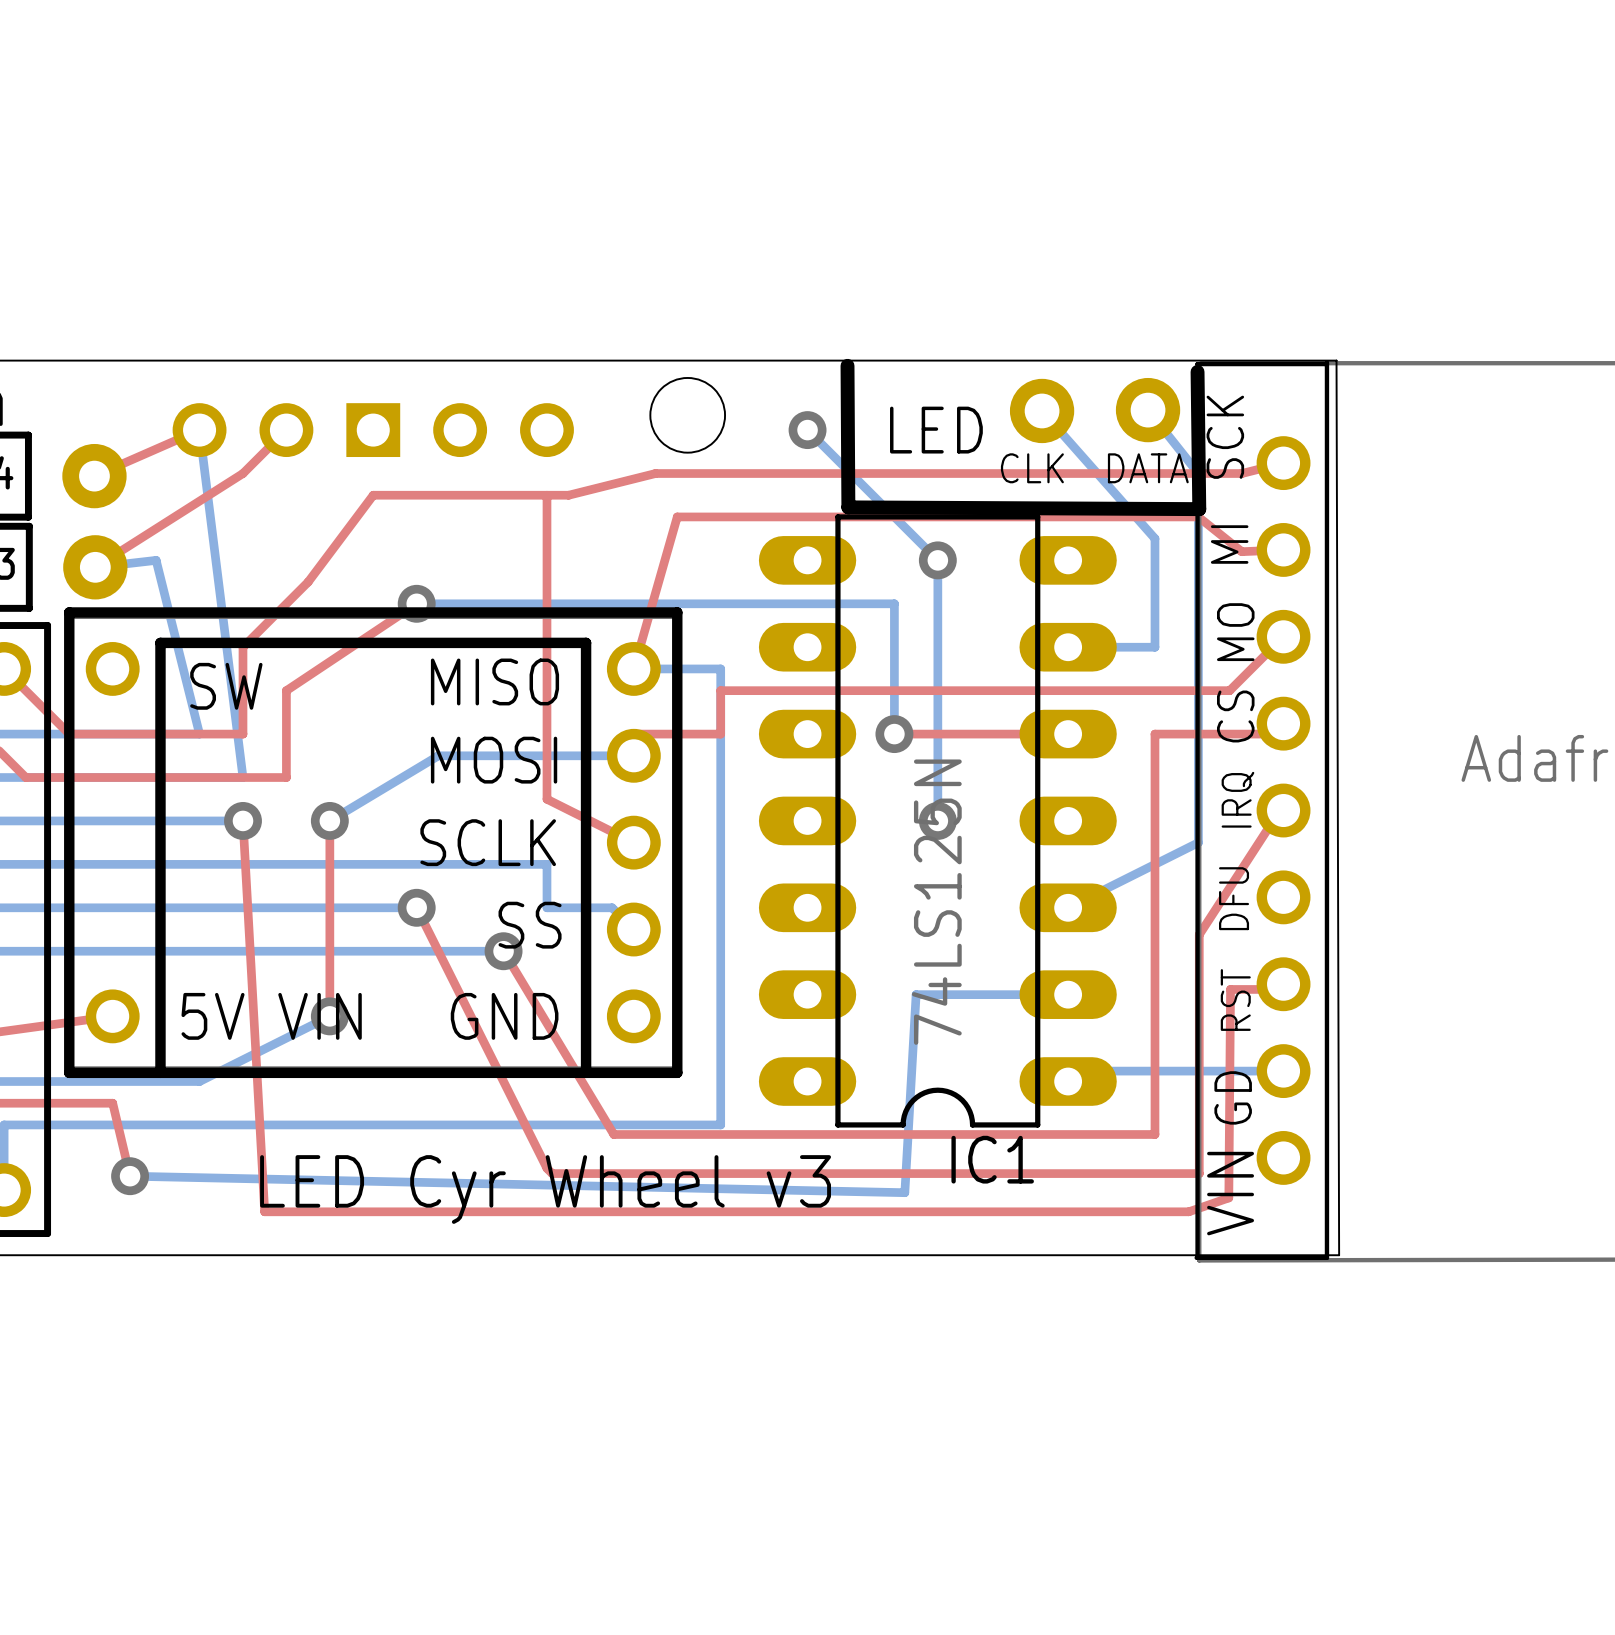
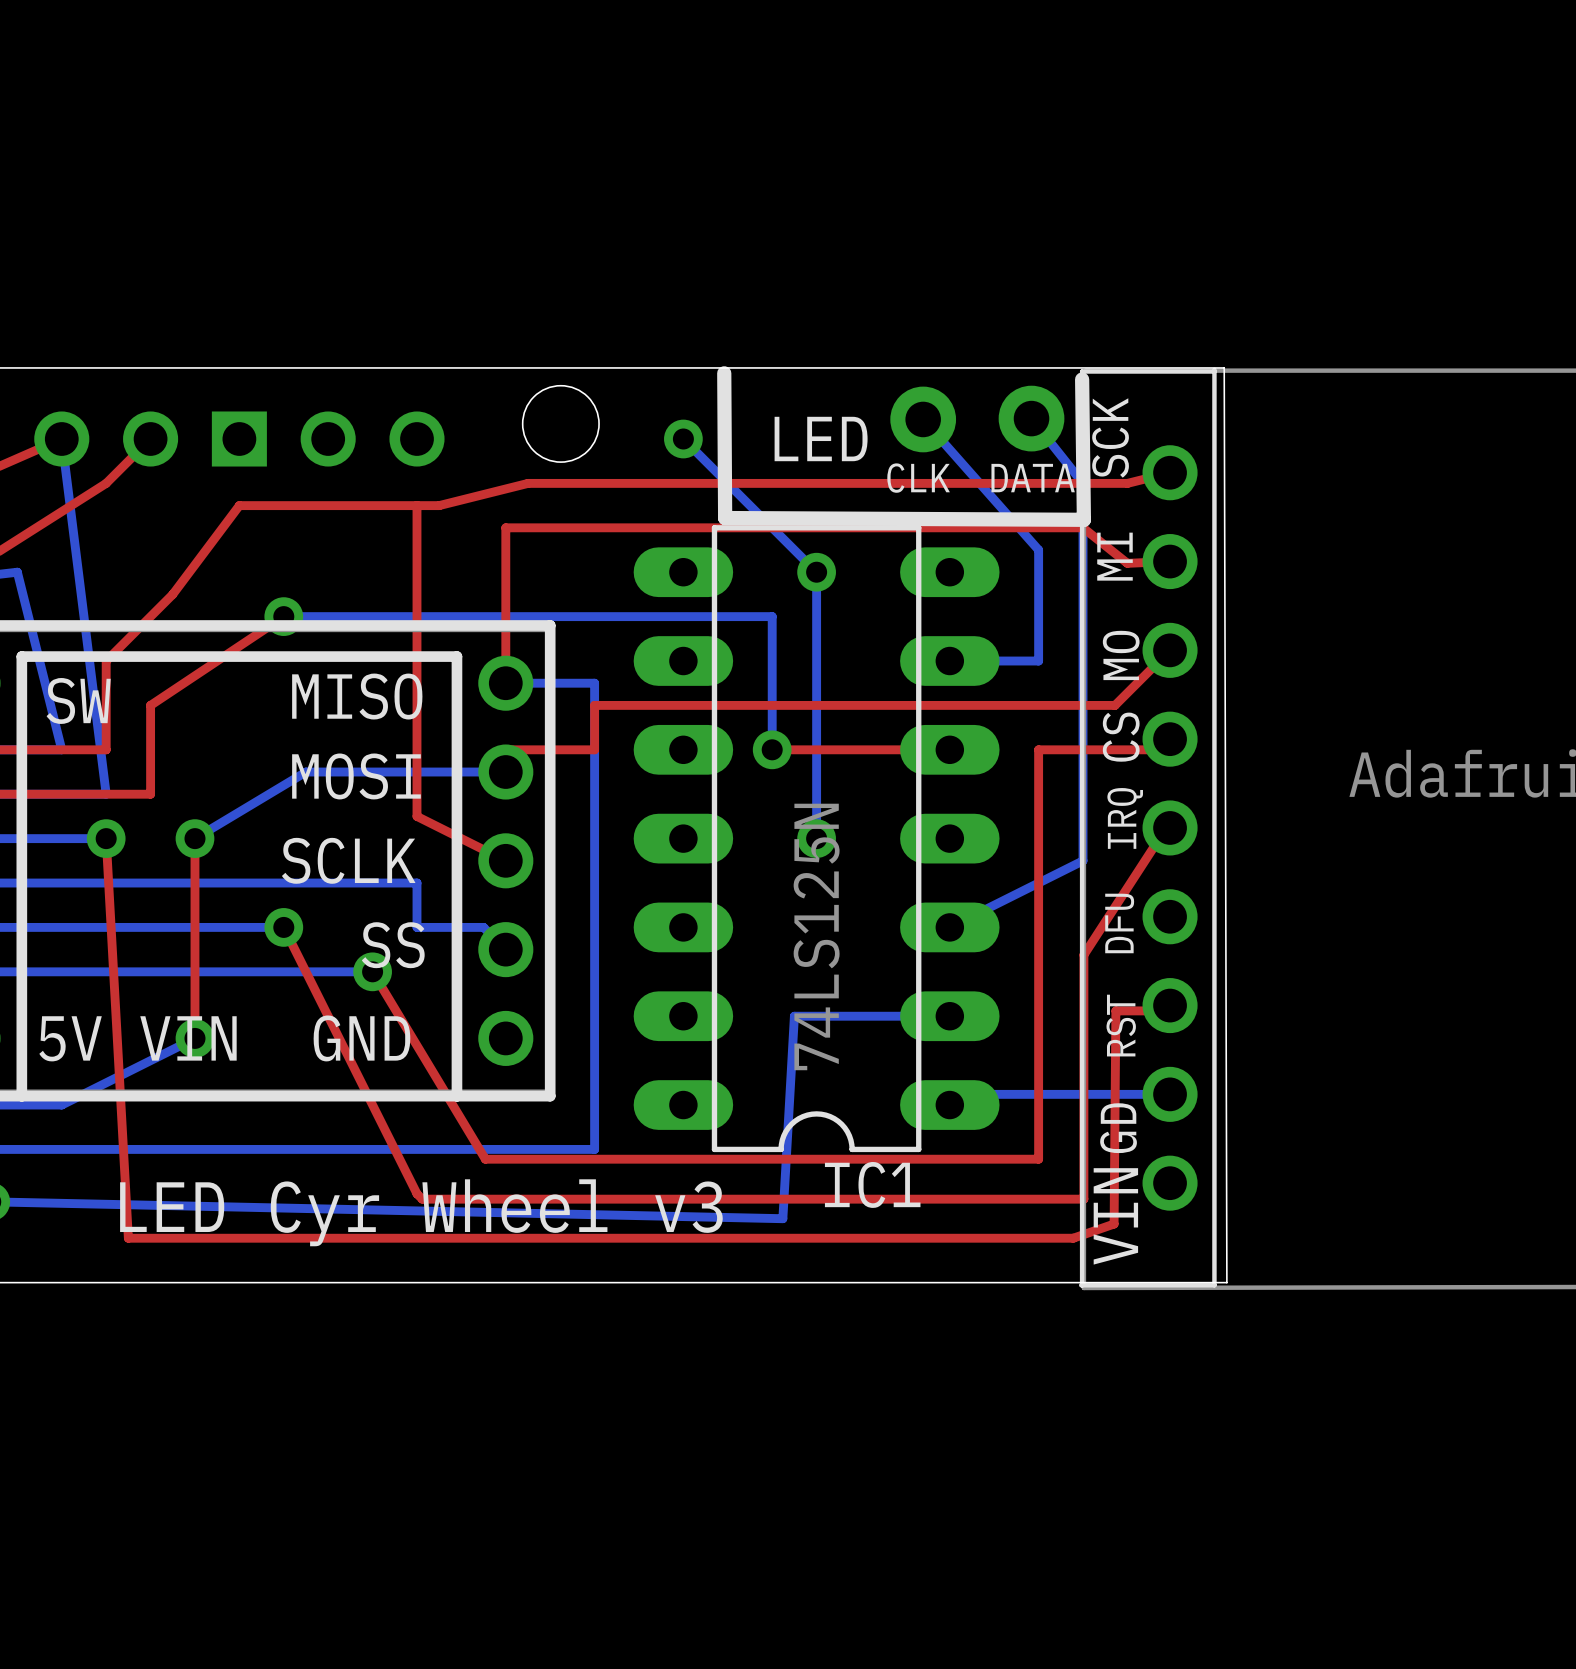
top track: (677, 516) (633, 668) -> (550, 527) (505, 527) (505, 683)

